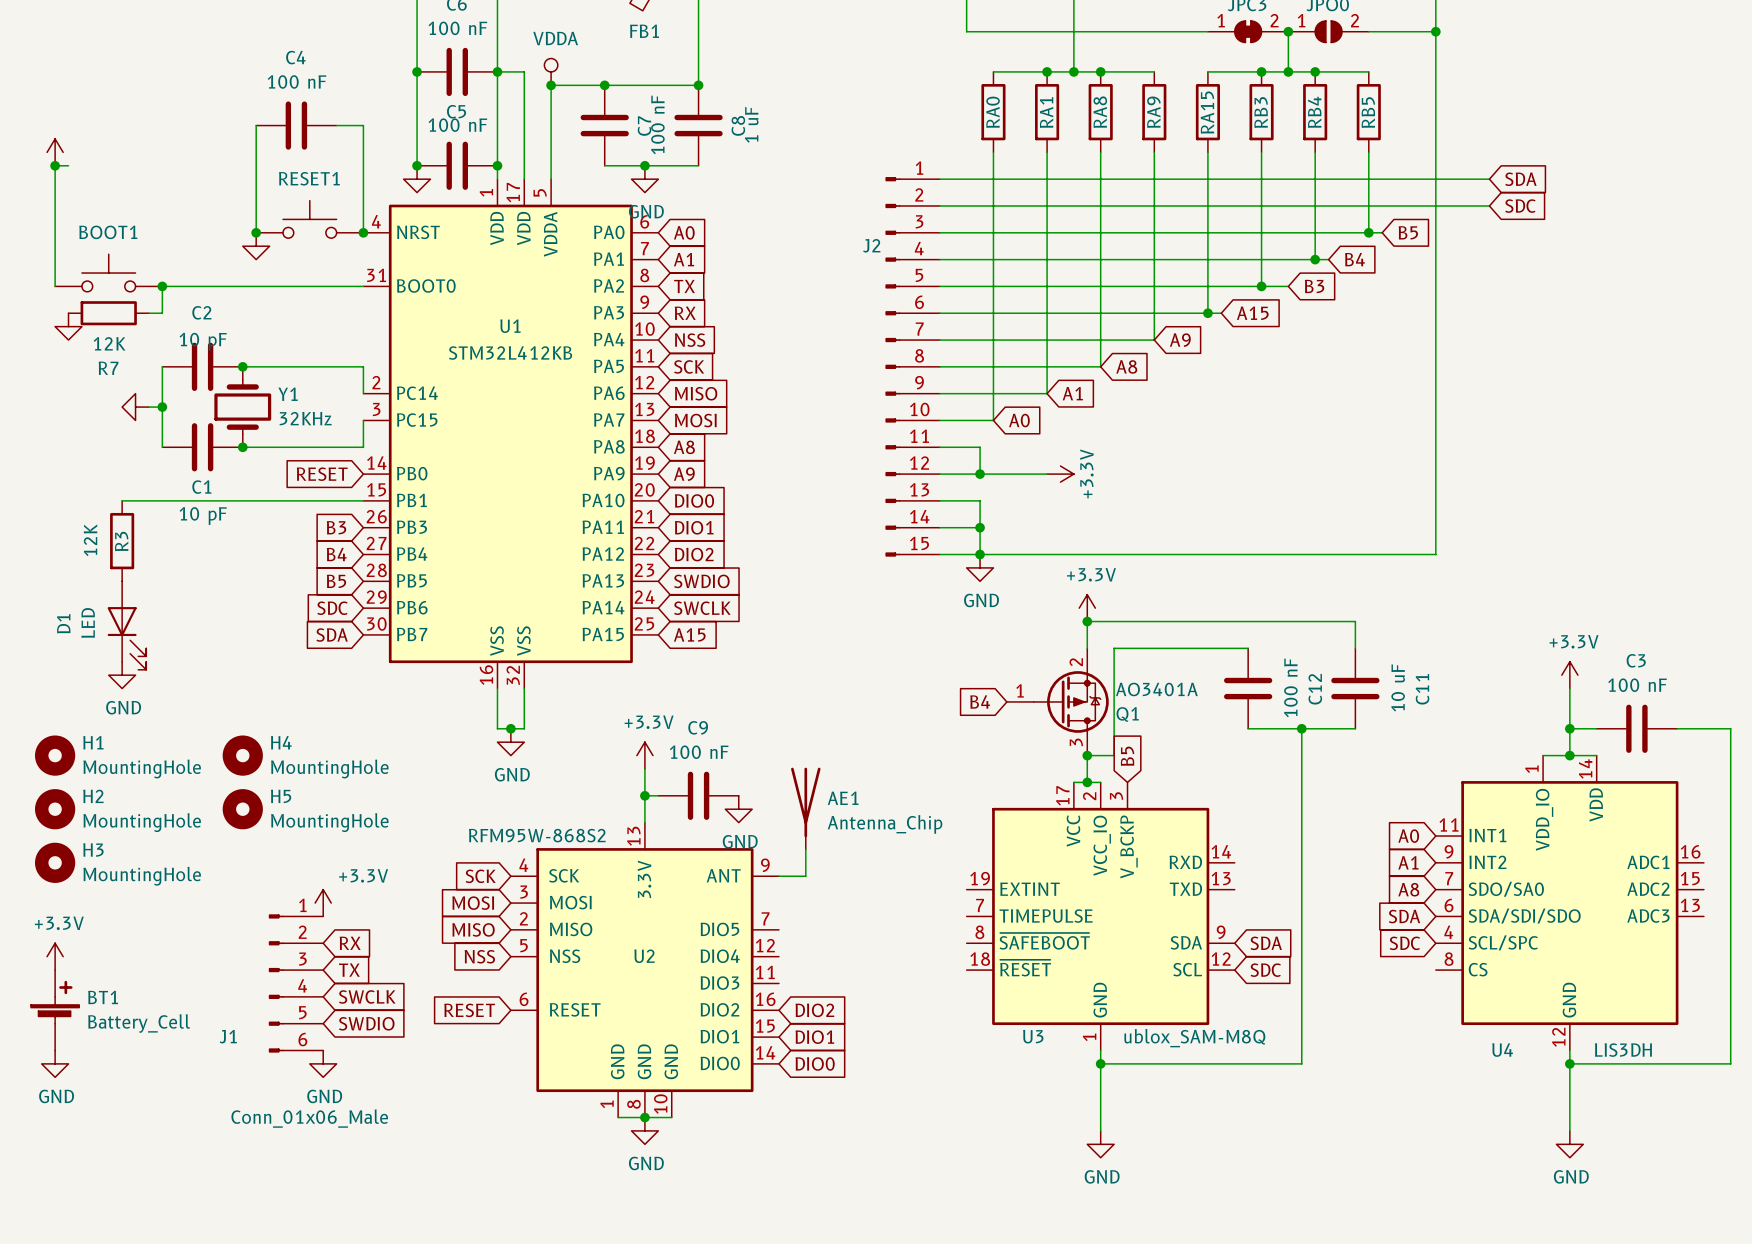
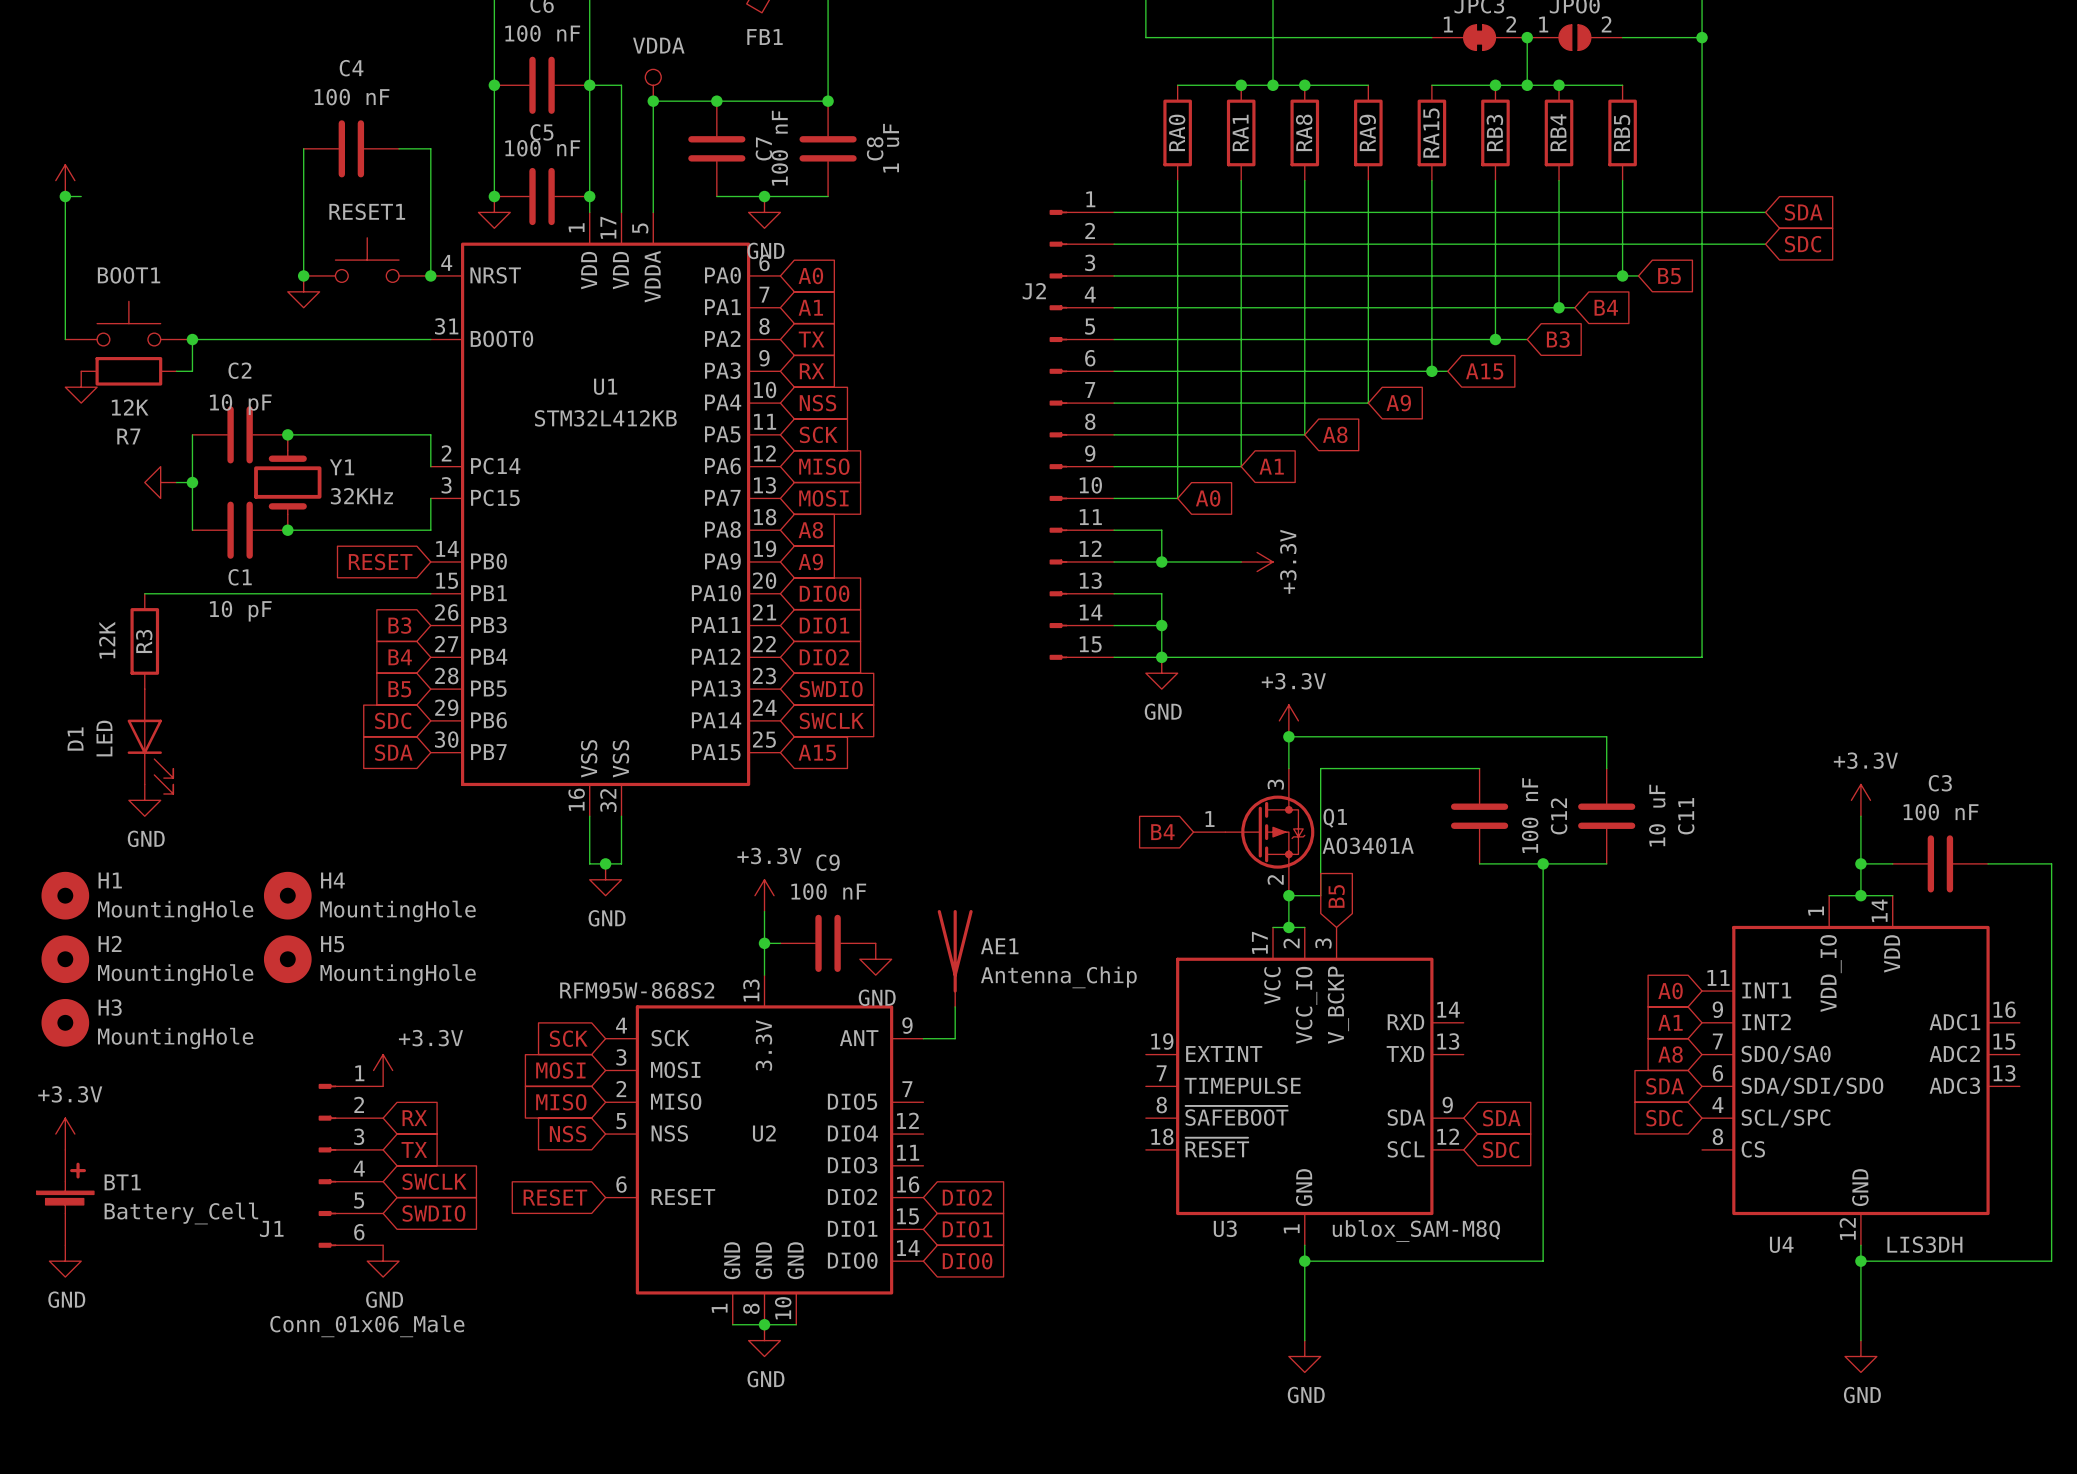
Q1 flip: as is (1071, 701) -> up-down (1269, 832)

